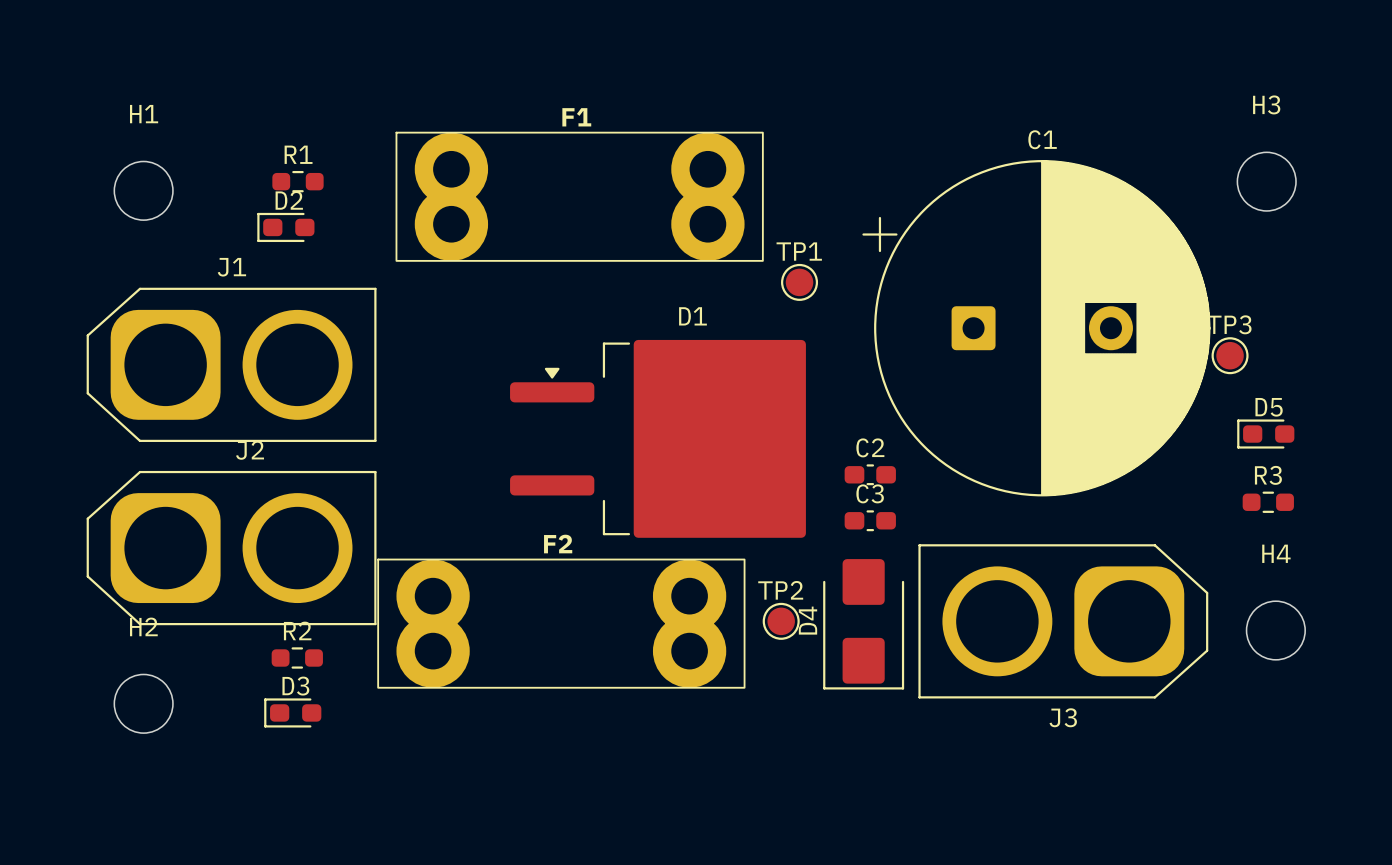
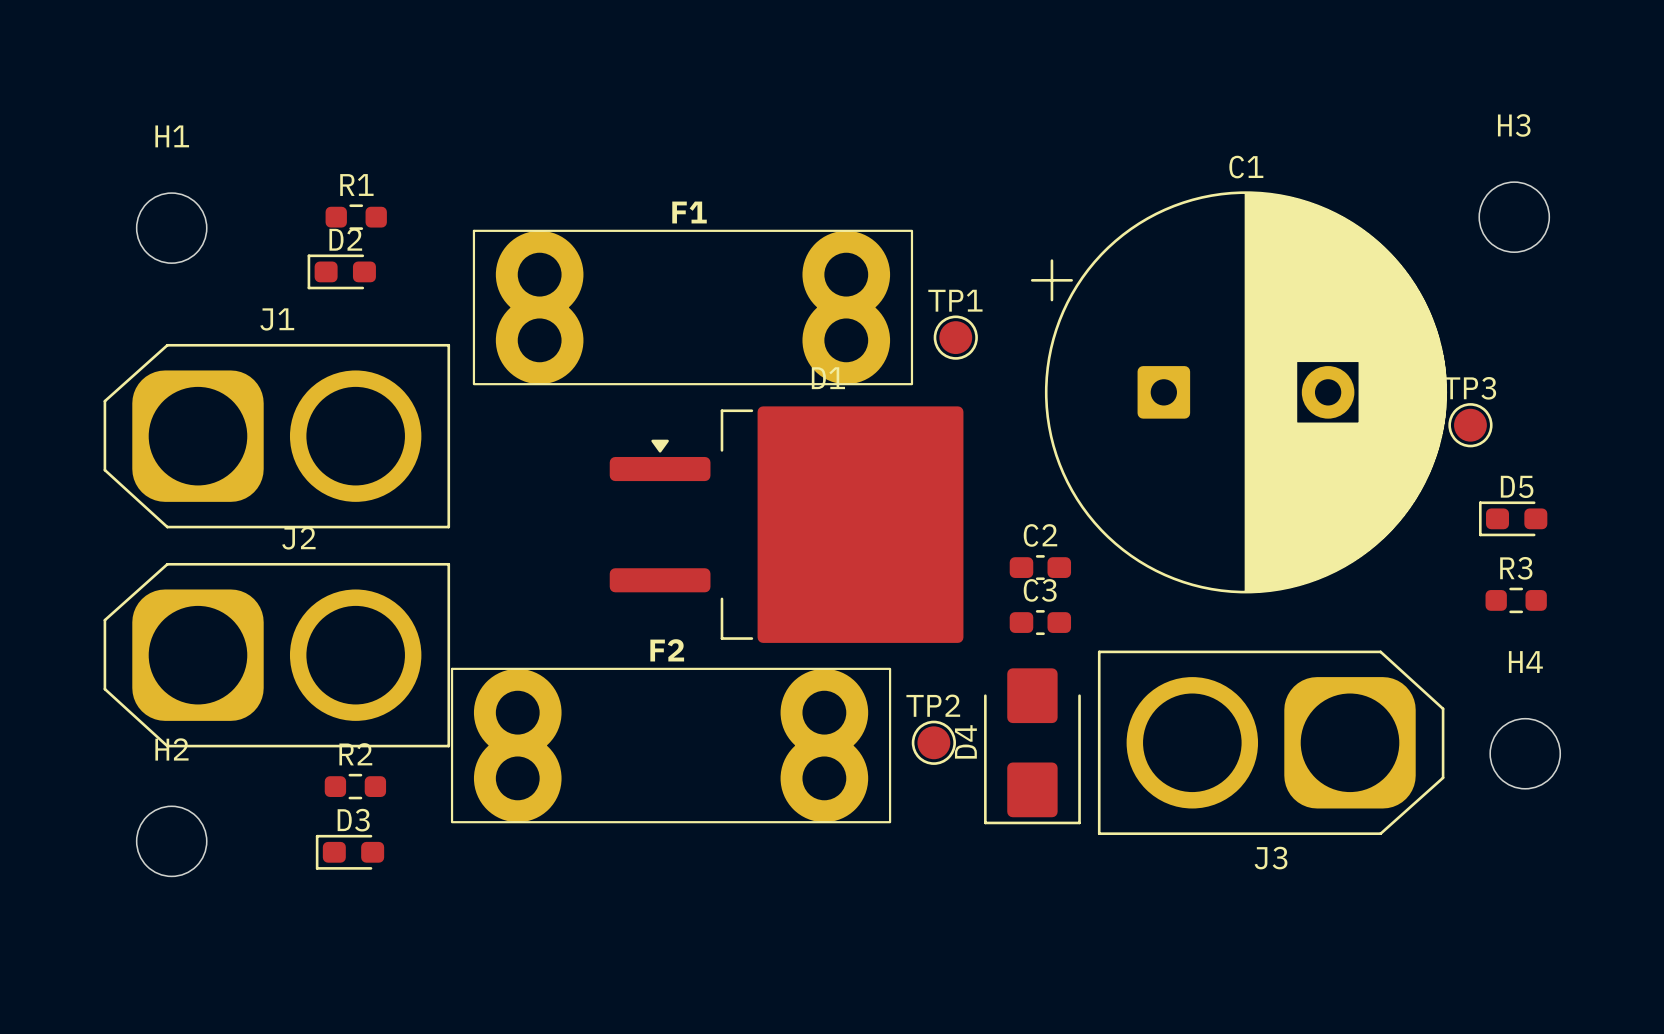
F1 position: (579, 196) -> (692, 307)

